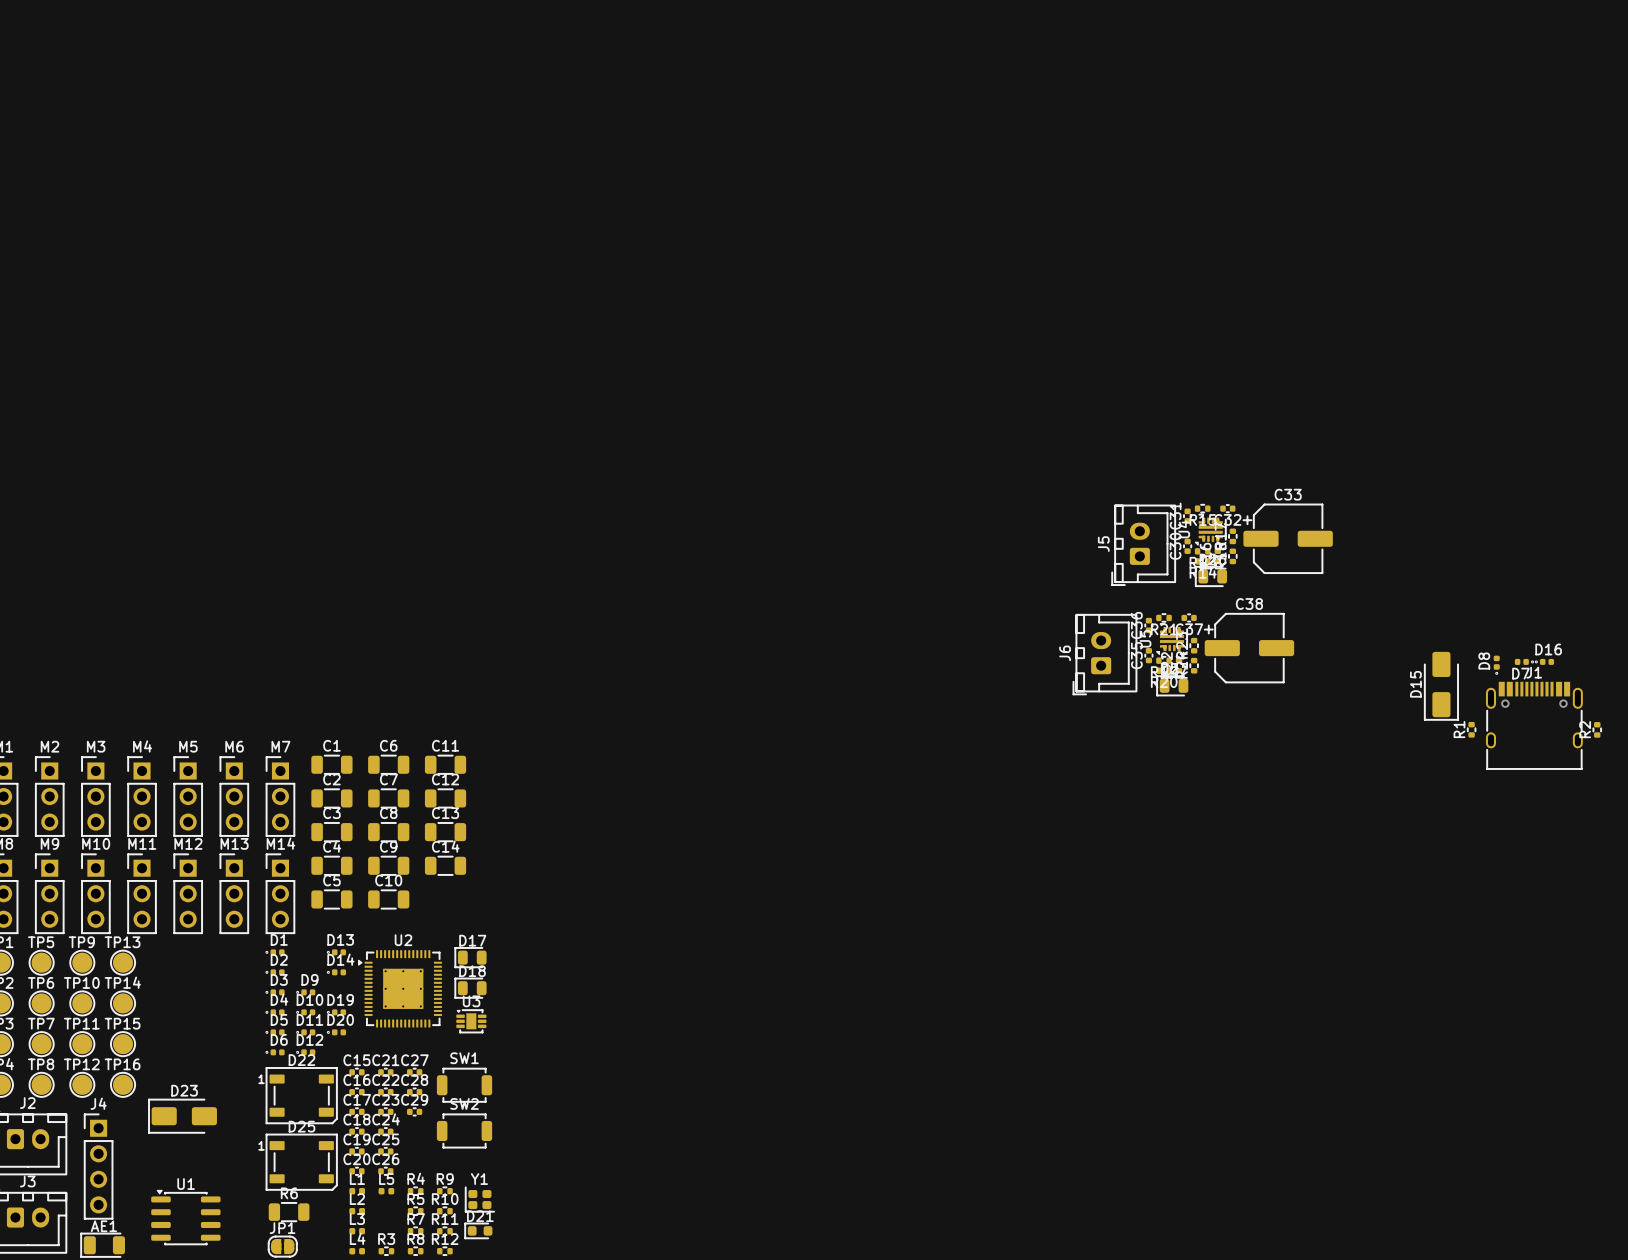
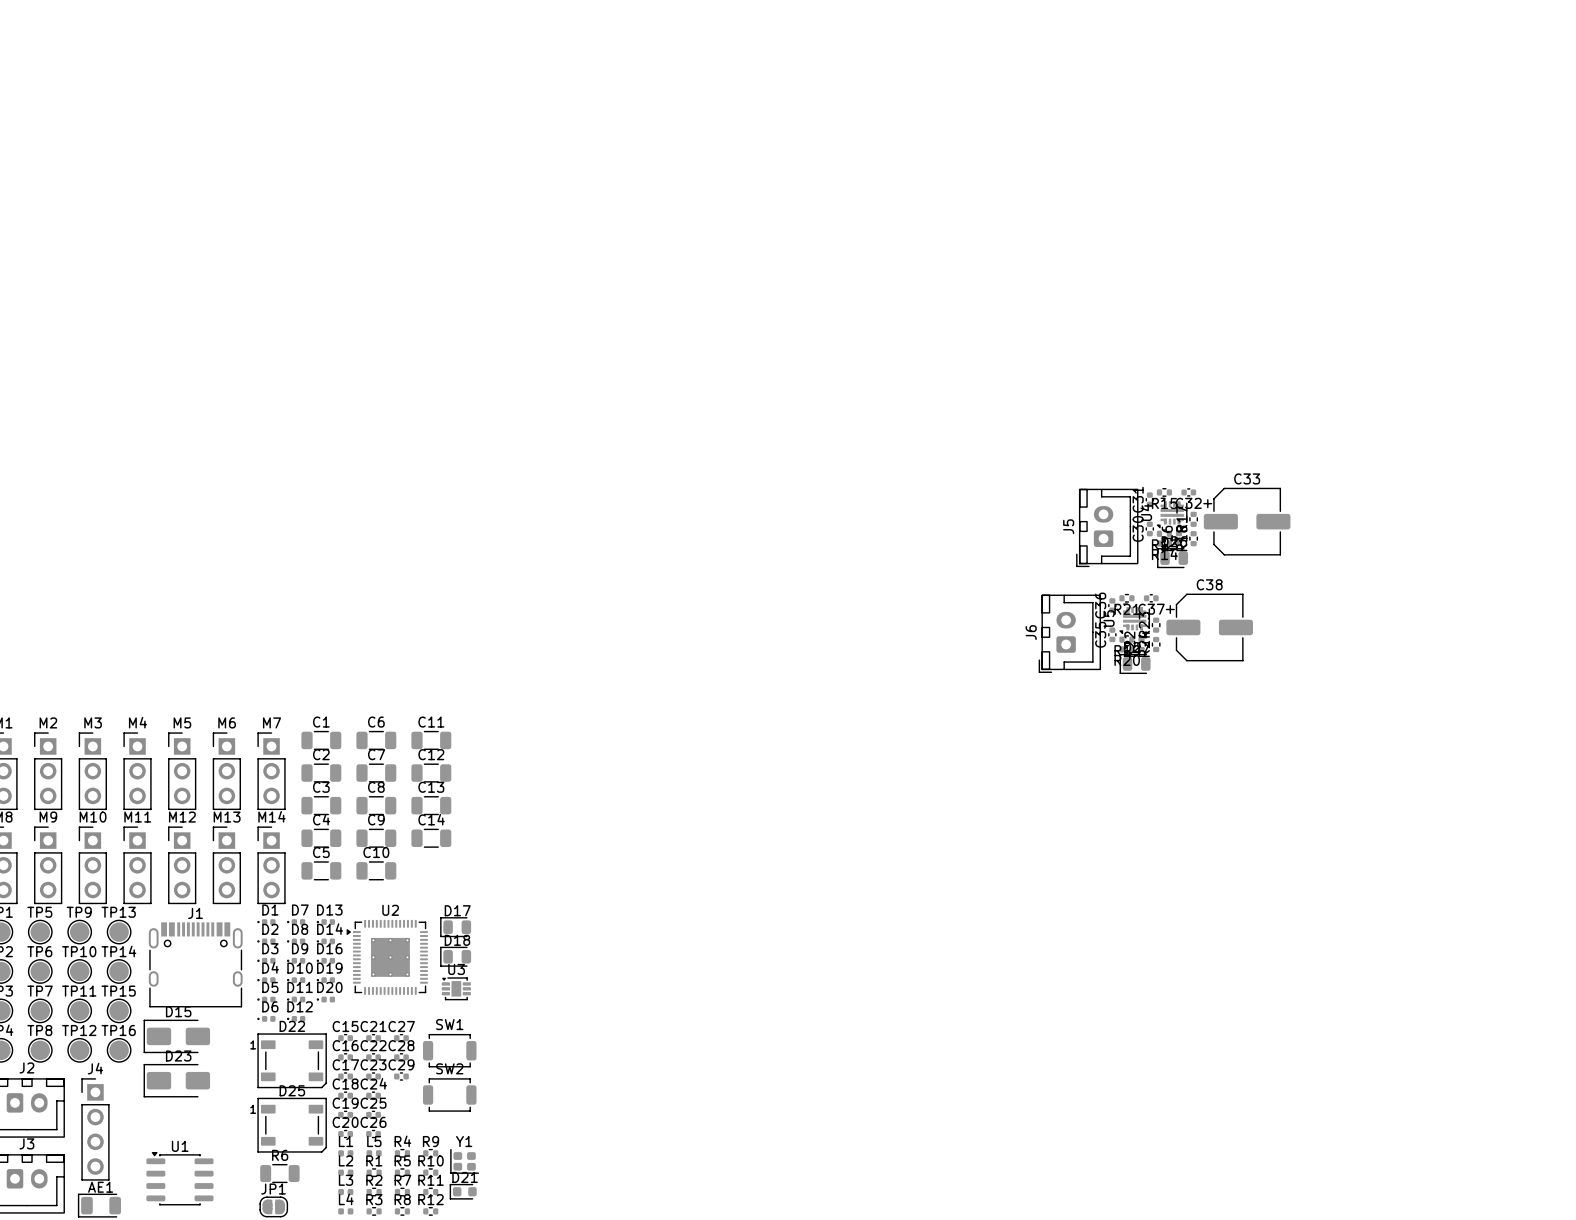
D7 rotation: 0° (1524, 661) -> 180° (296, 922)
D7 position: (1524, 661) -> (296, 922)
D16 position: (1544, 661) -> (325, 960)
D8 rotation: 0° (1496, 664) -> 90° clockwise (296, 941)
D8 position: (1496, 664) -> (296, 941)
D15 rotation: 0° (1441, 686) -> 90° clockwise (176, 1036)
D15 position: (1441, 686) -> (176, 1036)
J1 position: (1534, 725) -> (195, 964)
R1 rotation: 0° (1471, 729) -> 90° clockwise (374, 1172)
R1 position: (1471, 729) -> (374, 1172)
R2 rotation: 0° (1597, 729) -> 90° clockwise (374, 1192)
R2 position: (1597, 729) -> (374, 1192)

